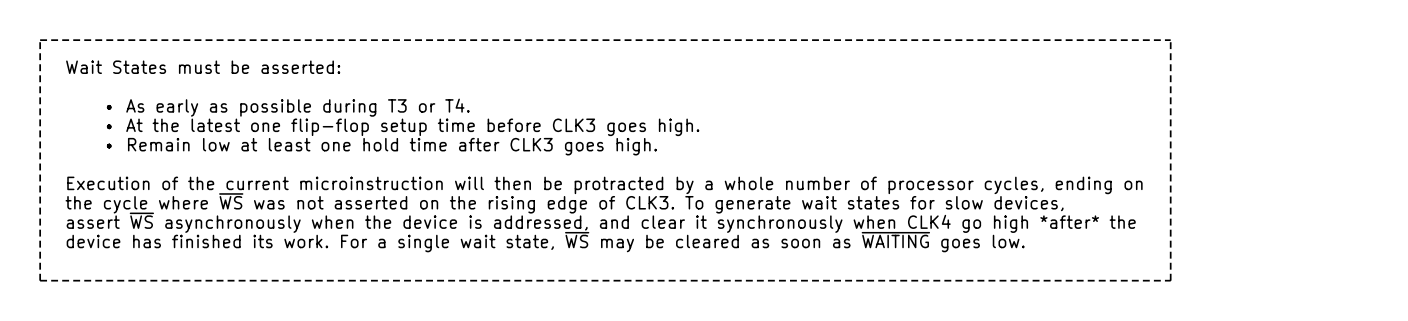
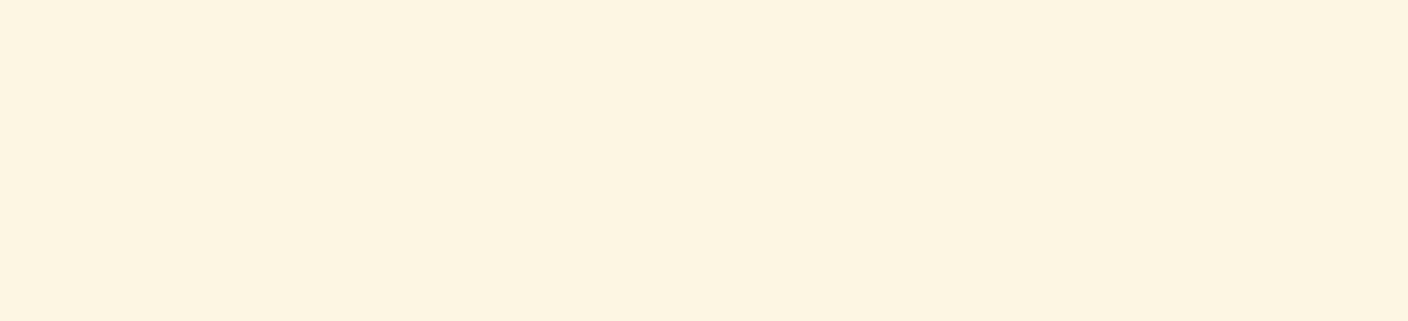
line: (40, 40) (40, 280) (1170, 280) (1170, 40) (40, 40) -> none
text: Wait States must be asserted: (203, 67) -> none
text: • As early as possible during T3 or T4. (288, 107) -> none
text: • At the latest one flip-flop setup time before CLK3 goes high. (403, 127) -> none
text: • Remain low at least one hold time after CLK3 goes high. (381, 146) -> none
text: Execution of the current microinstruction will then be protracted by a whole number of processor cycles, ending on (604, 185) -> none
text: the cycle where ~{WS} was not asserted on the rising edge of CLK3. To generate wait states for slow devices, (564, 203) -> none
text: assert ~{WS} asynchronously when the device is addressed, and clear it synchronously when CLK4 go high *after* the (601, 222) -> none
text: device has finished its work. For a single wait state, ~{WS} may be cleared as soon as ~{WAITING} goes low. (545, 242) -> none

